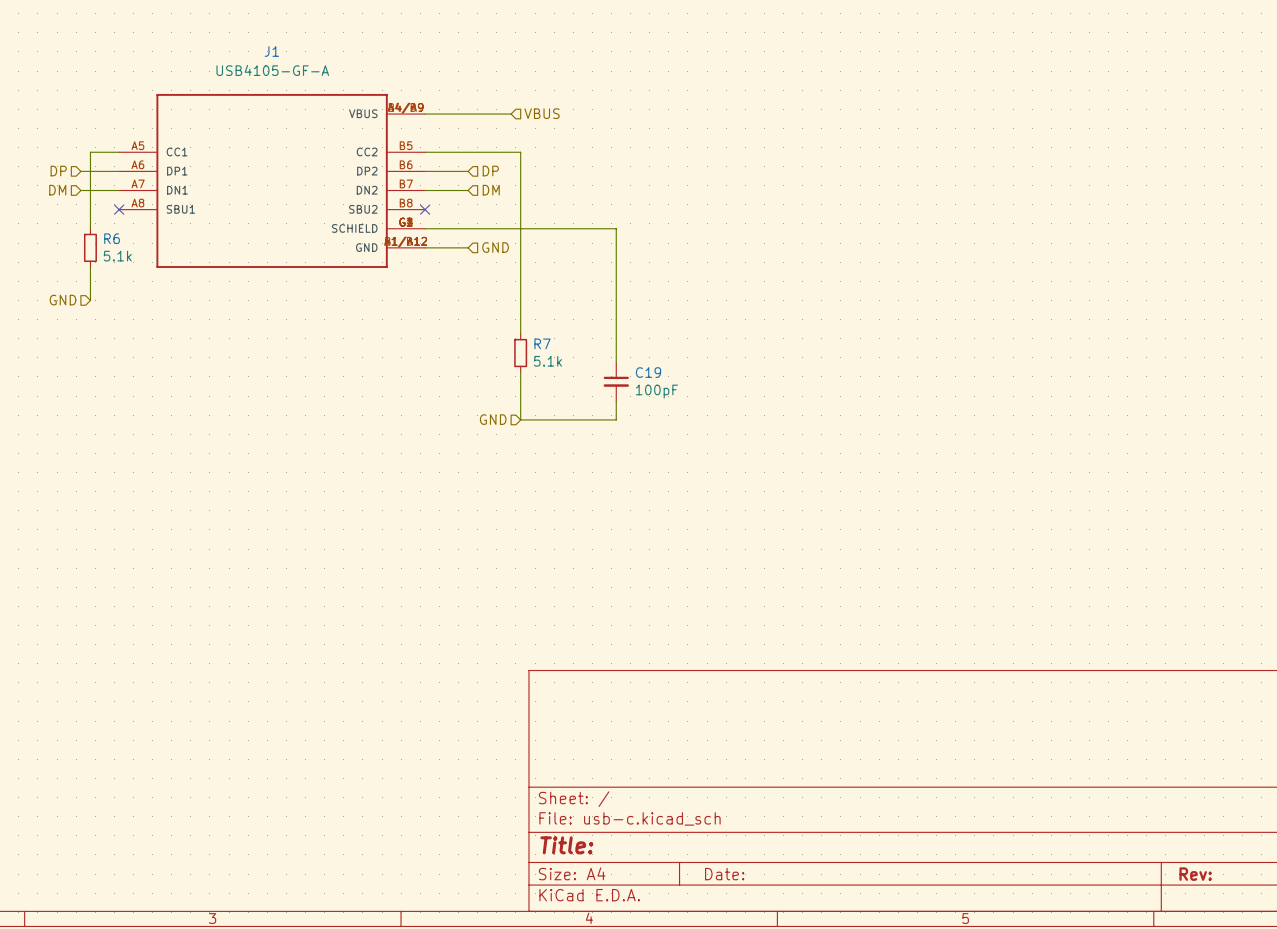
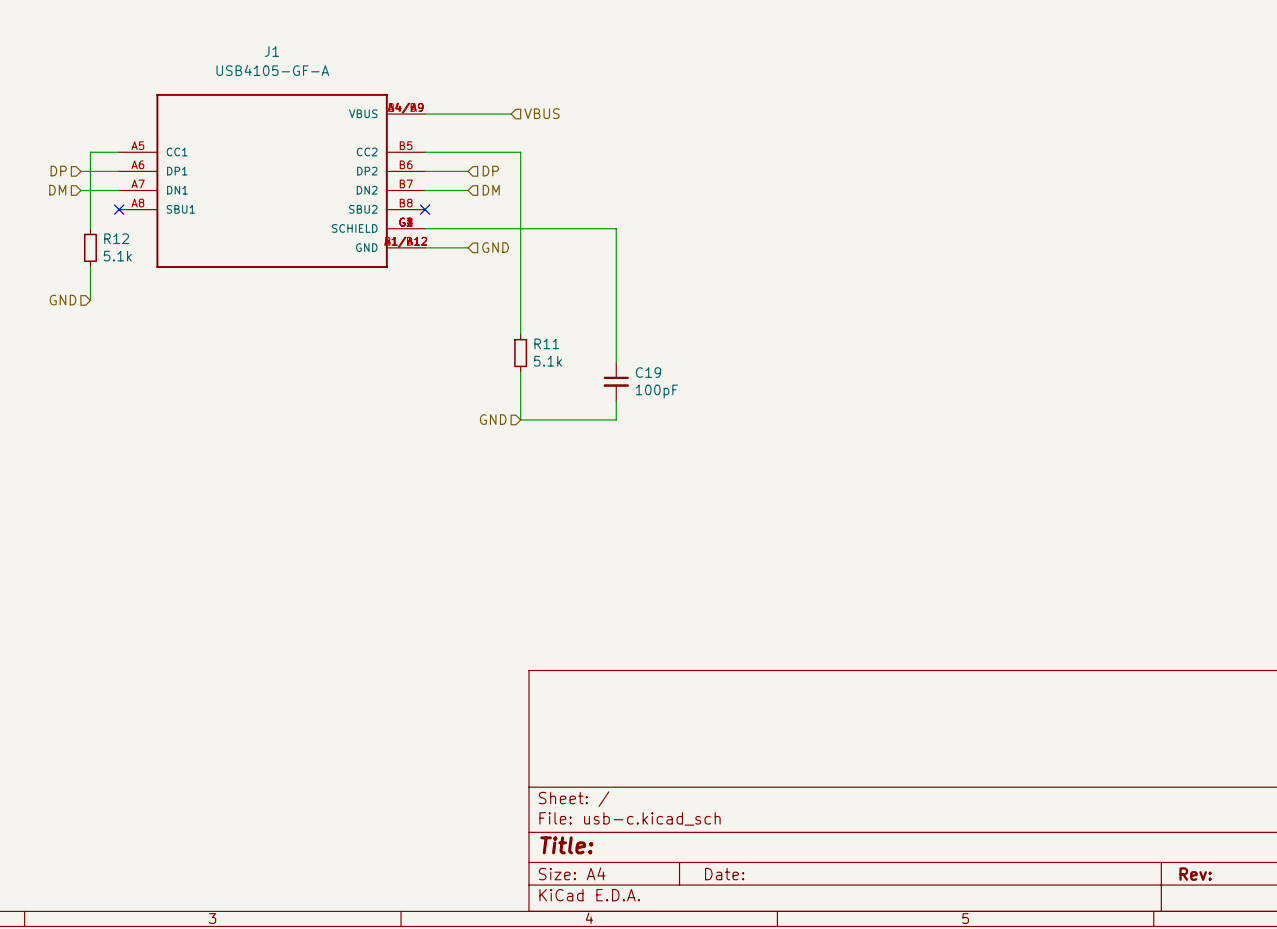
R6 name: R6 (112, 238) -> R12 (116, 238)
R7 name: R7 (542, 343) -> R11 (546, 343)

